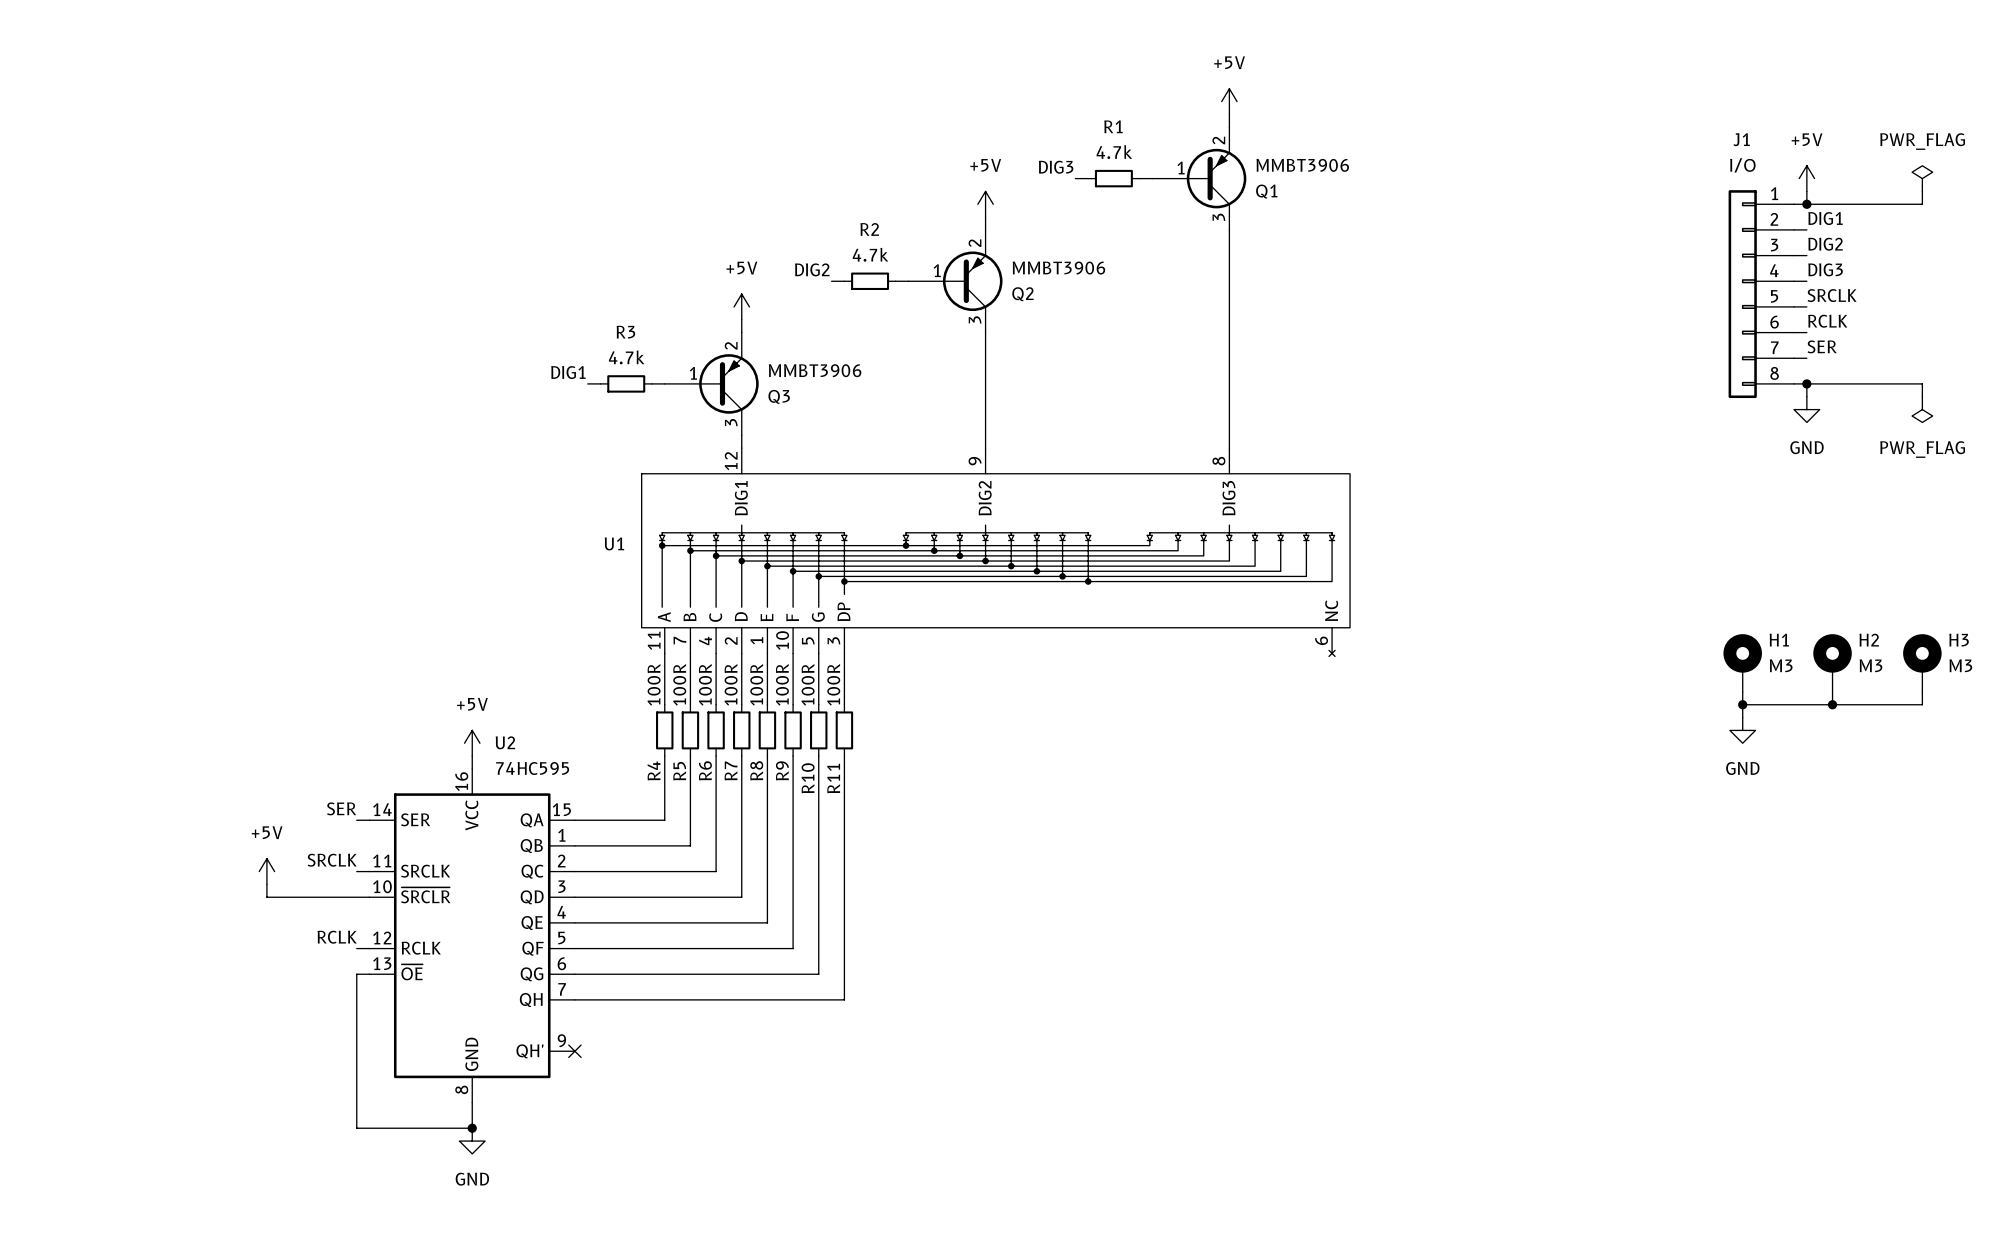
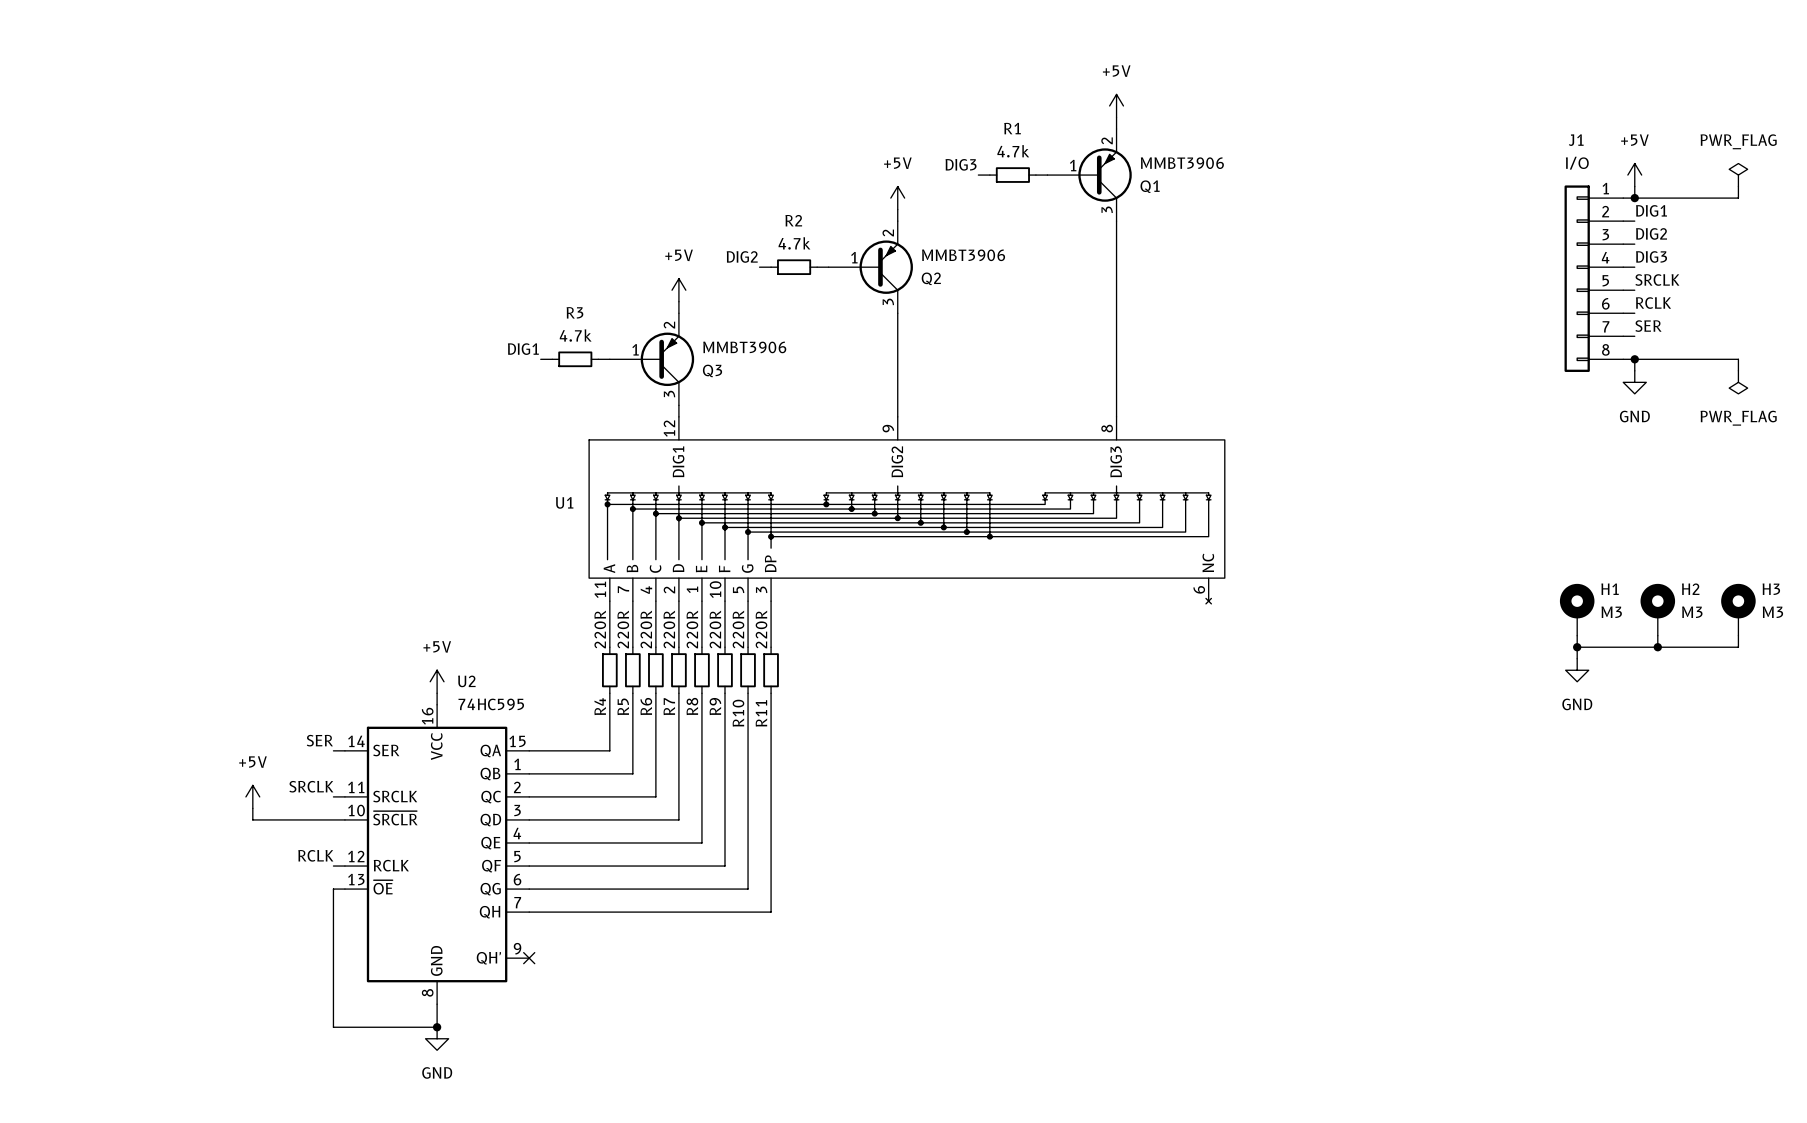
R4 value: 100R (654, 684) -> 220R (600, 629)
R5 value: 100R (679, 684) -> 220R (623, 629)
R6 value: 100R (705, 684) -> 220R (646, 629)
R7 value: 100R (731, 684) -> 220R (669, 629)
R8 value: 100R (756, 684) -> 220R (692, 629)
R9 value: 100R (782, 684) -> 220R (715, 629)
R10 value: 100R (808, 684) -> 220R (738, 629)
R11 value: 100R (833, 684) -> 220R (761, 629)

